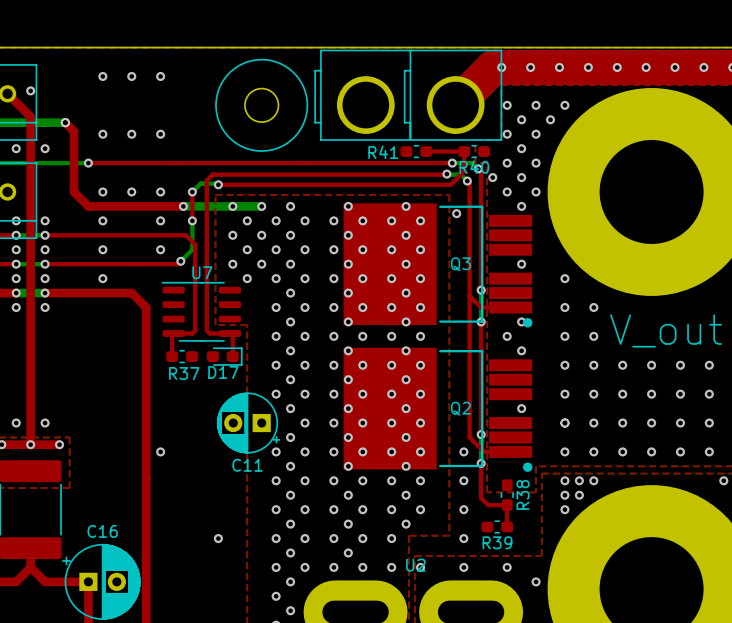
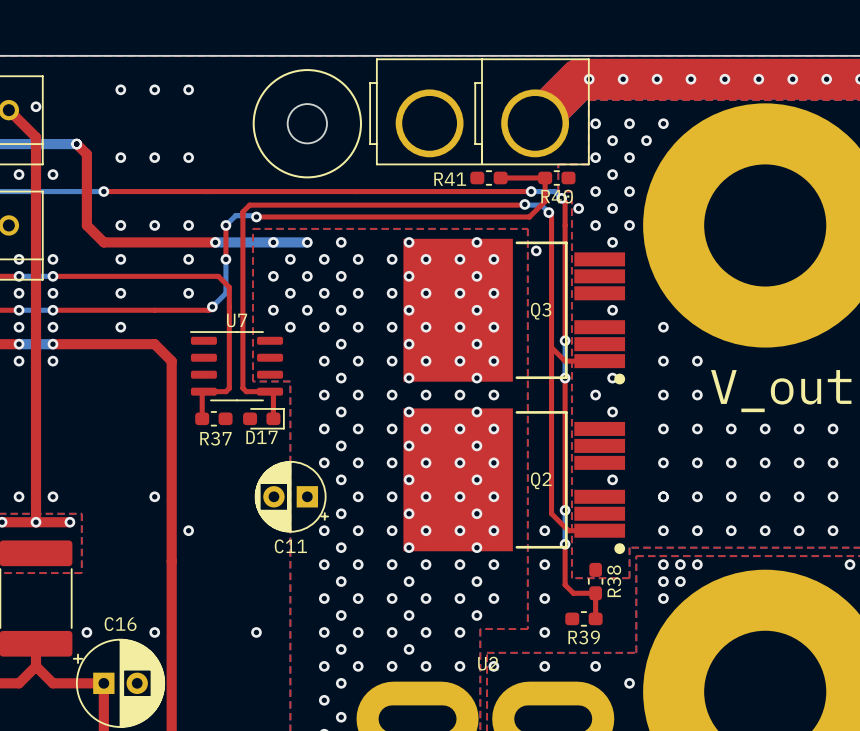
via: none -> (154, 496)
via: none -> (86, 632)
via: none -> (154, 632)

